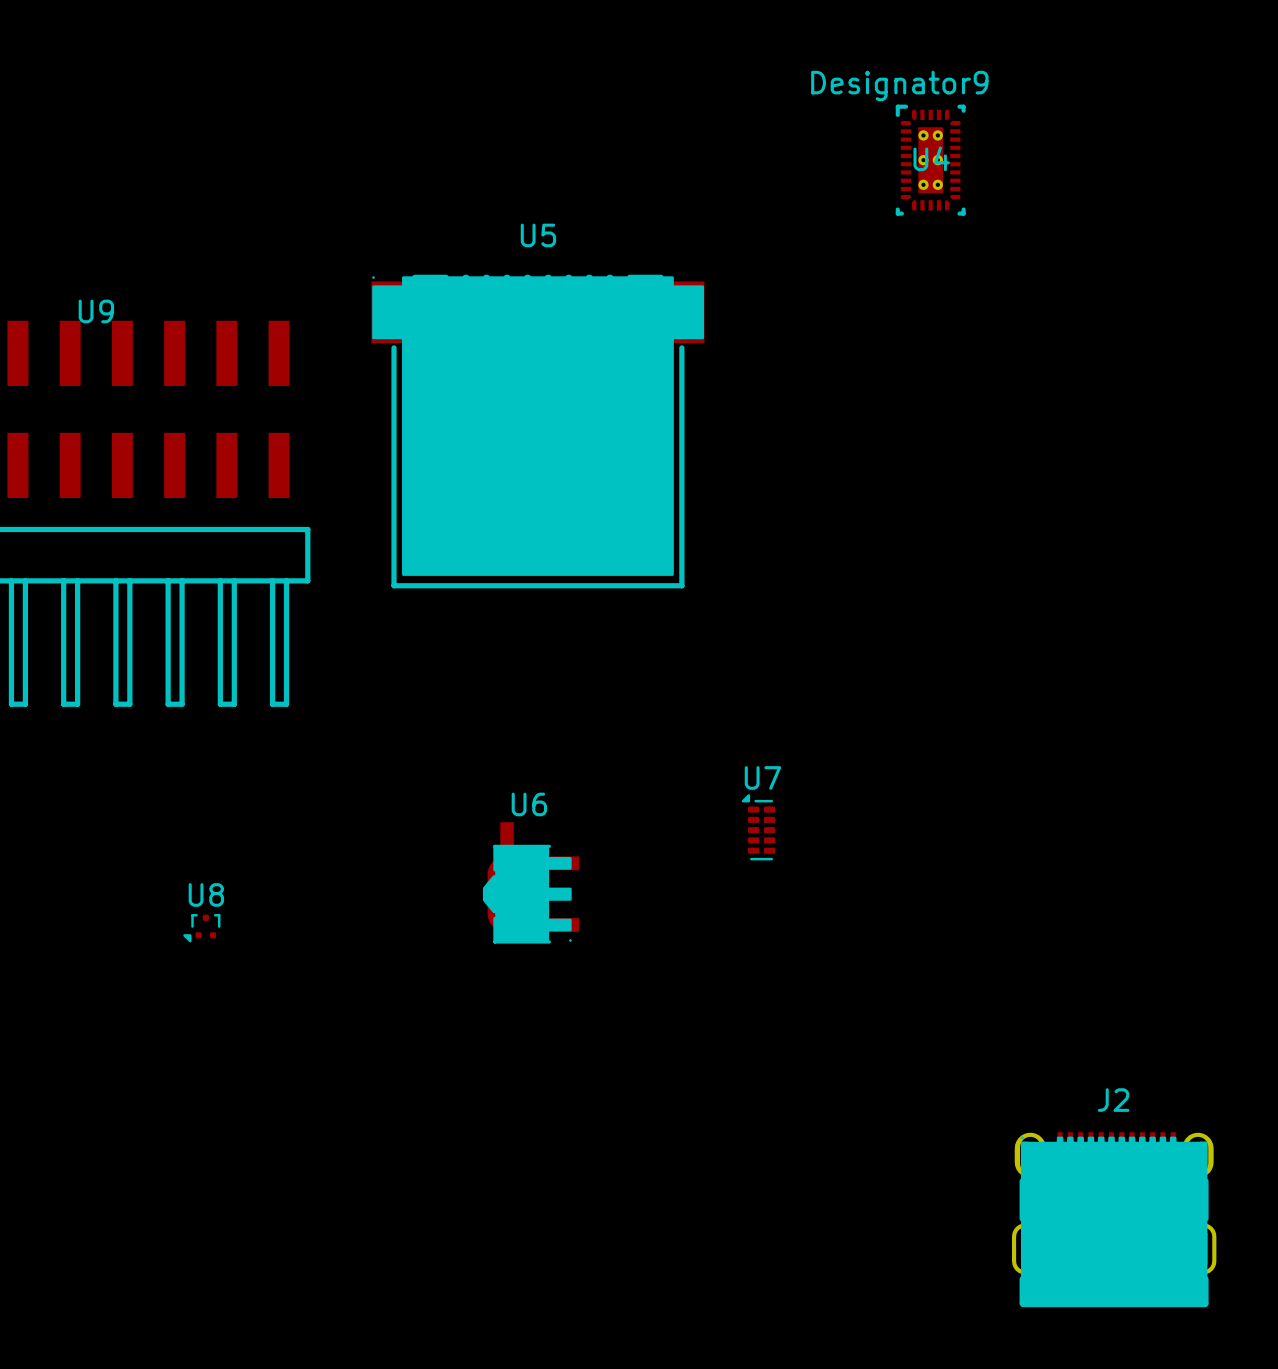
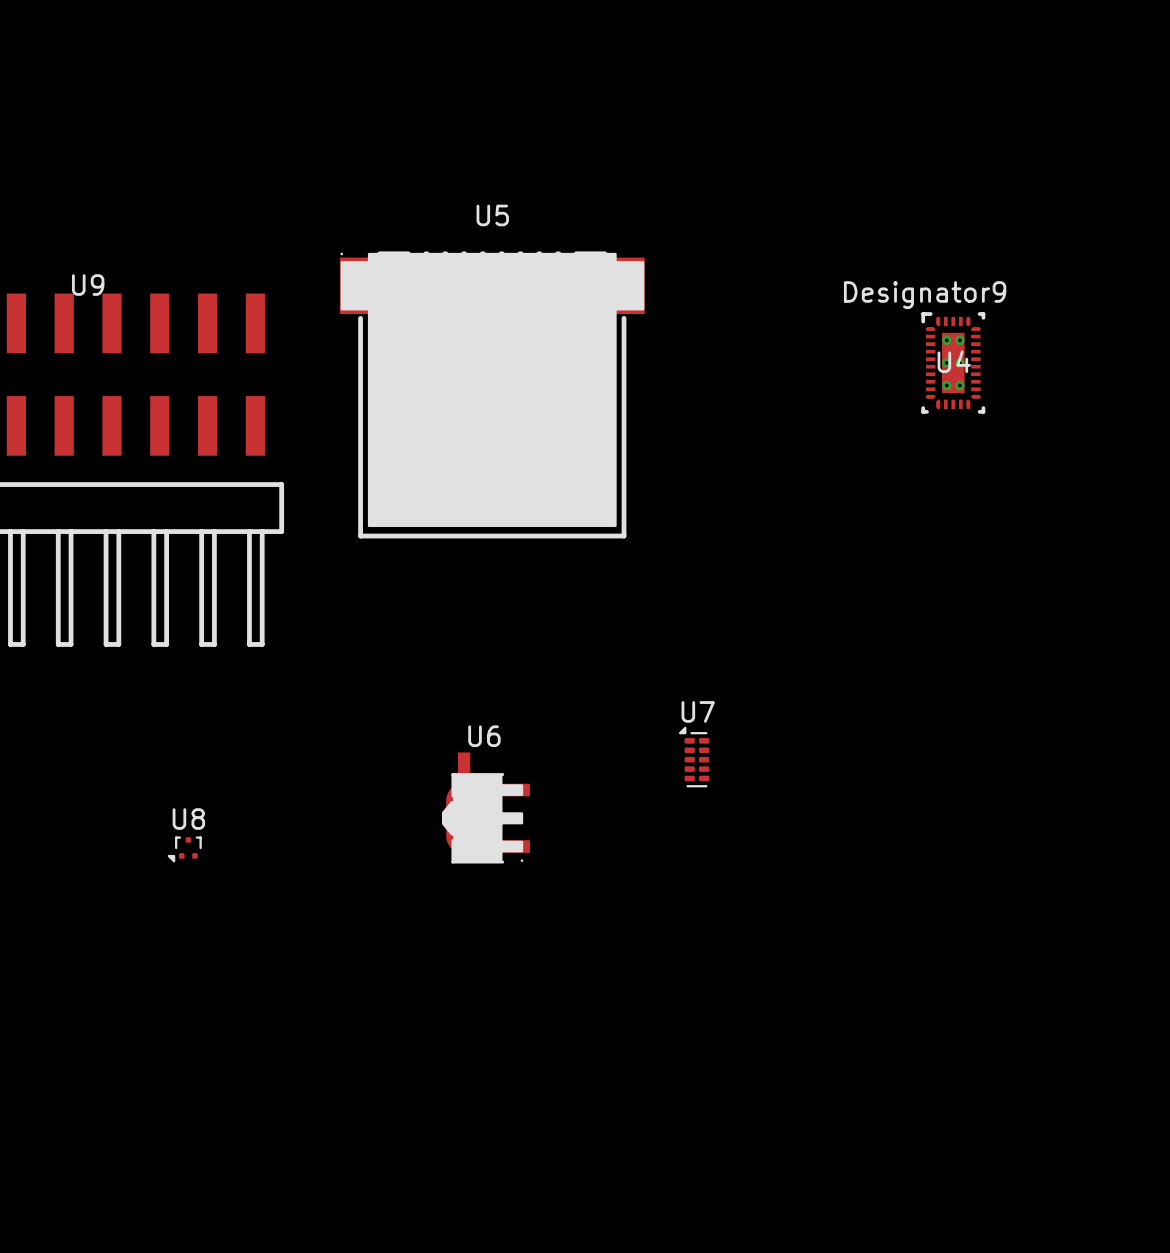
U4 position: (930, 160) -> (953, 362)
J2: (1114, 1219) -> none

